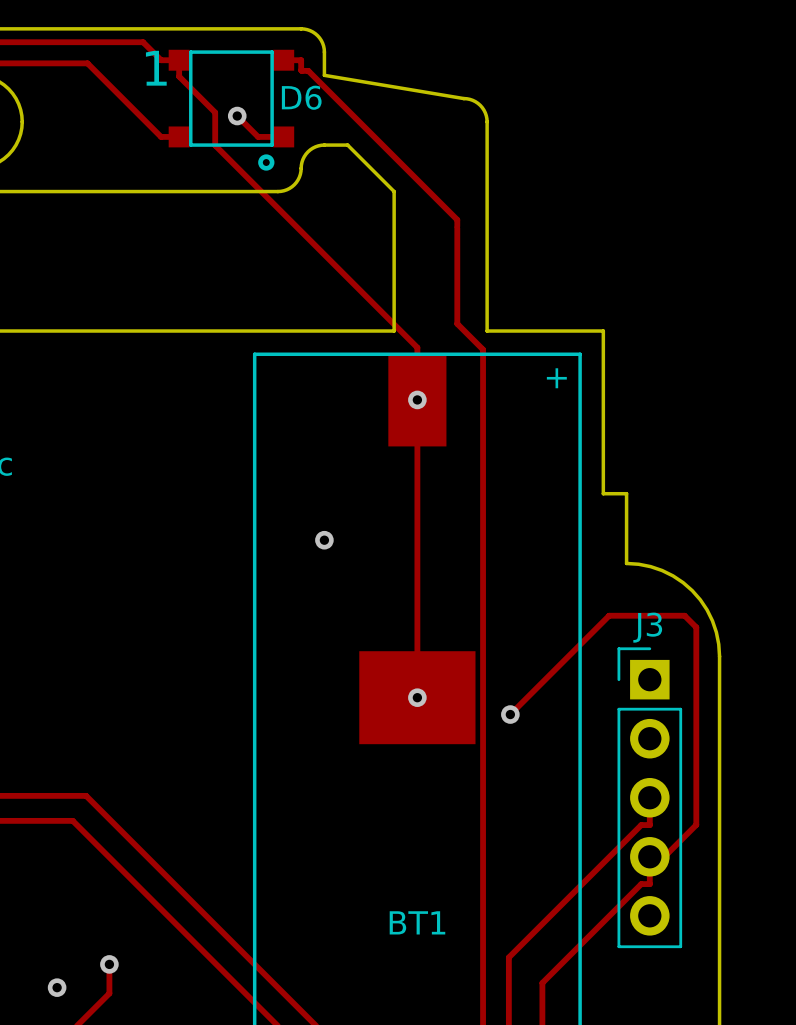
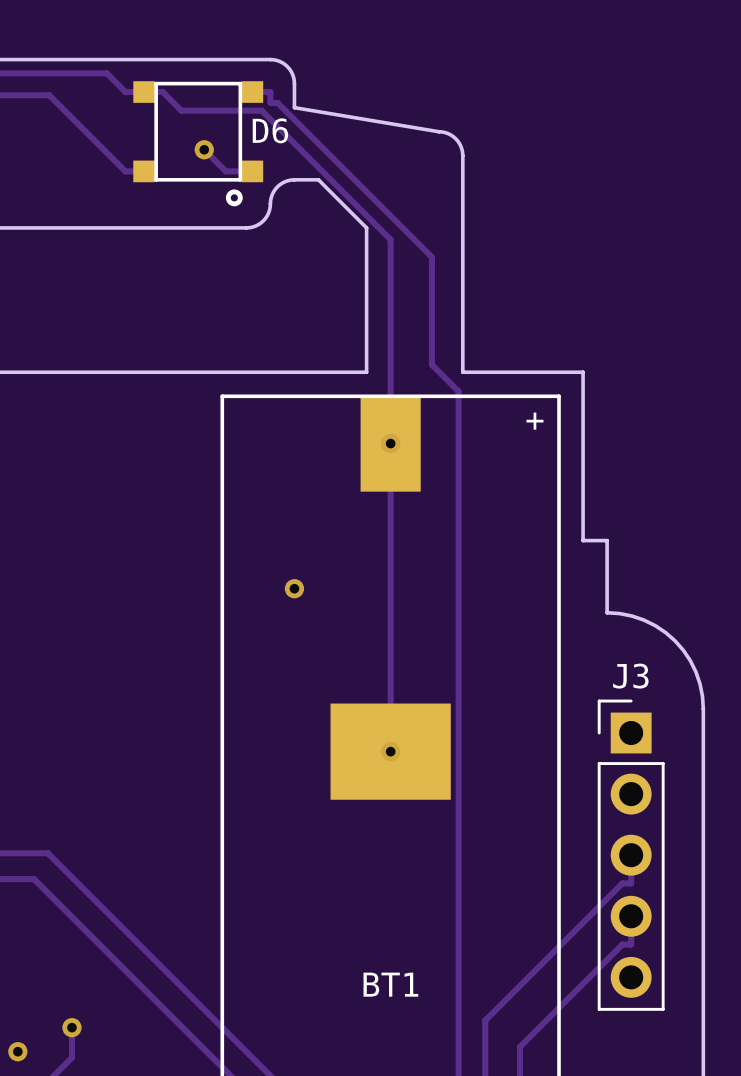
track: (179, 60) (179, 76) (215, 112) (215, 145) (417, 347) -> (144, 92) (162, 92) (181, 110) (261, 110) (390, 239) (390, 389)
text: 1 (156, 68) -> none
track: (510, 714) (609, 615) (684, 615) (696, 627) (696, 824) (664, 856) (649, 856) -> none
via: (510, 714) -> none

